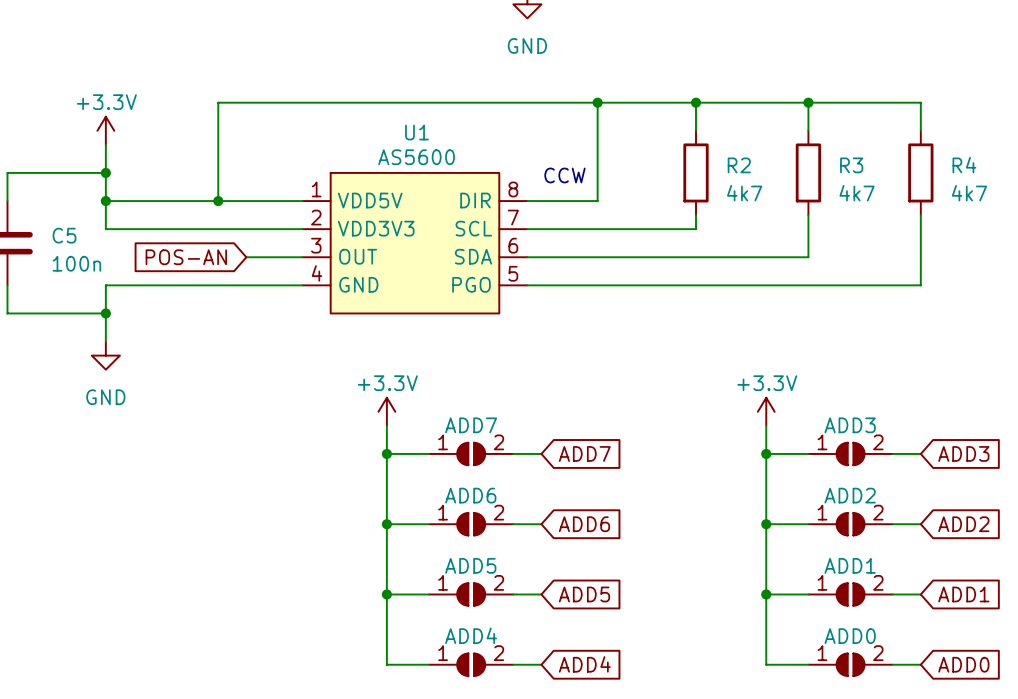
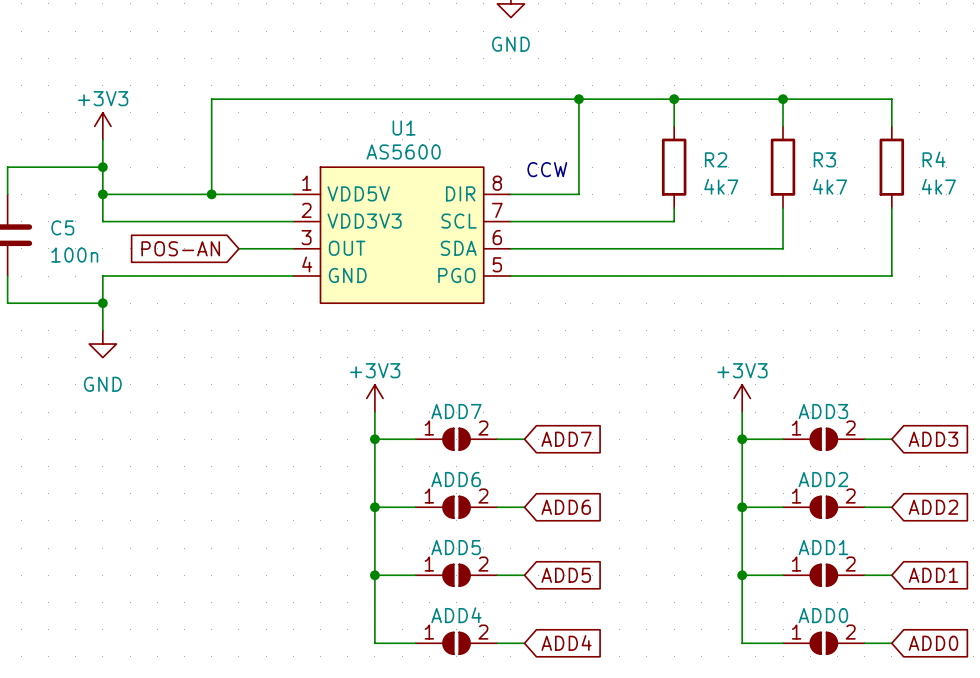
power symbol: +3.3V (105, 130) -> +3V3 (102, 126)
power symbol: +3.3V (386, 411) -> +3V3 (374, 398)
power symbol: +3.3V (766, 411) -> +3V3 (742, 398)

